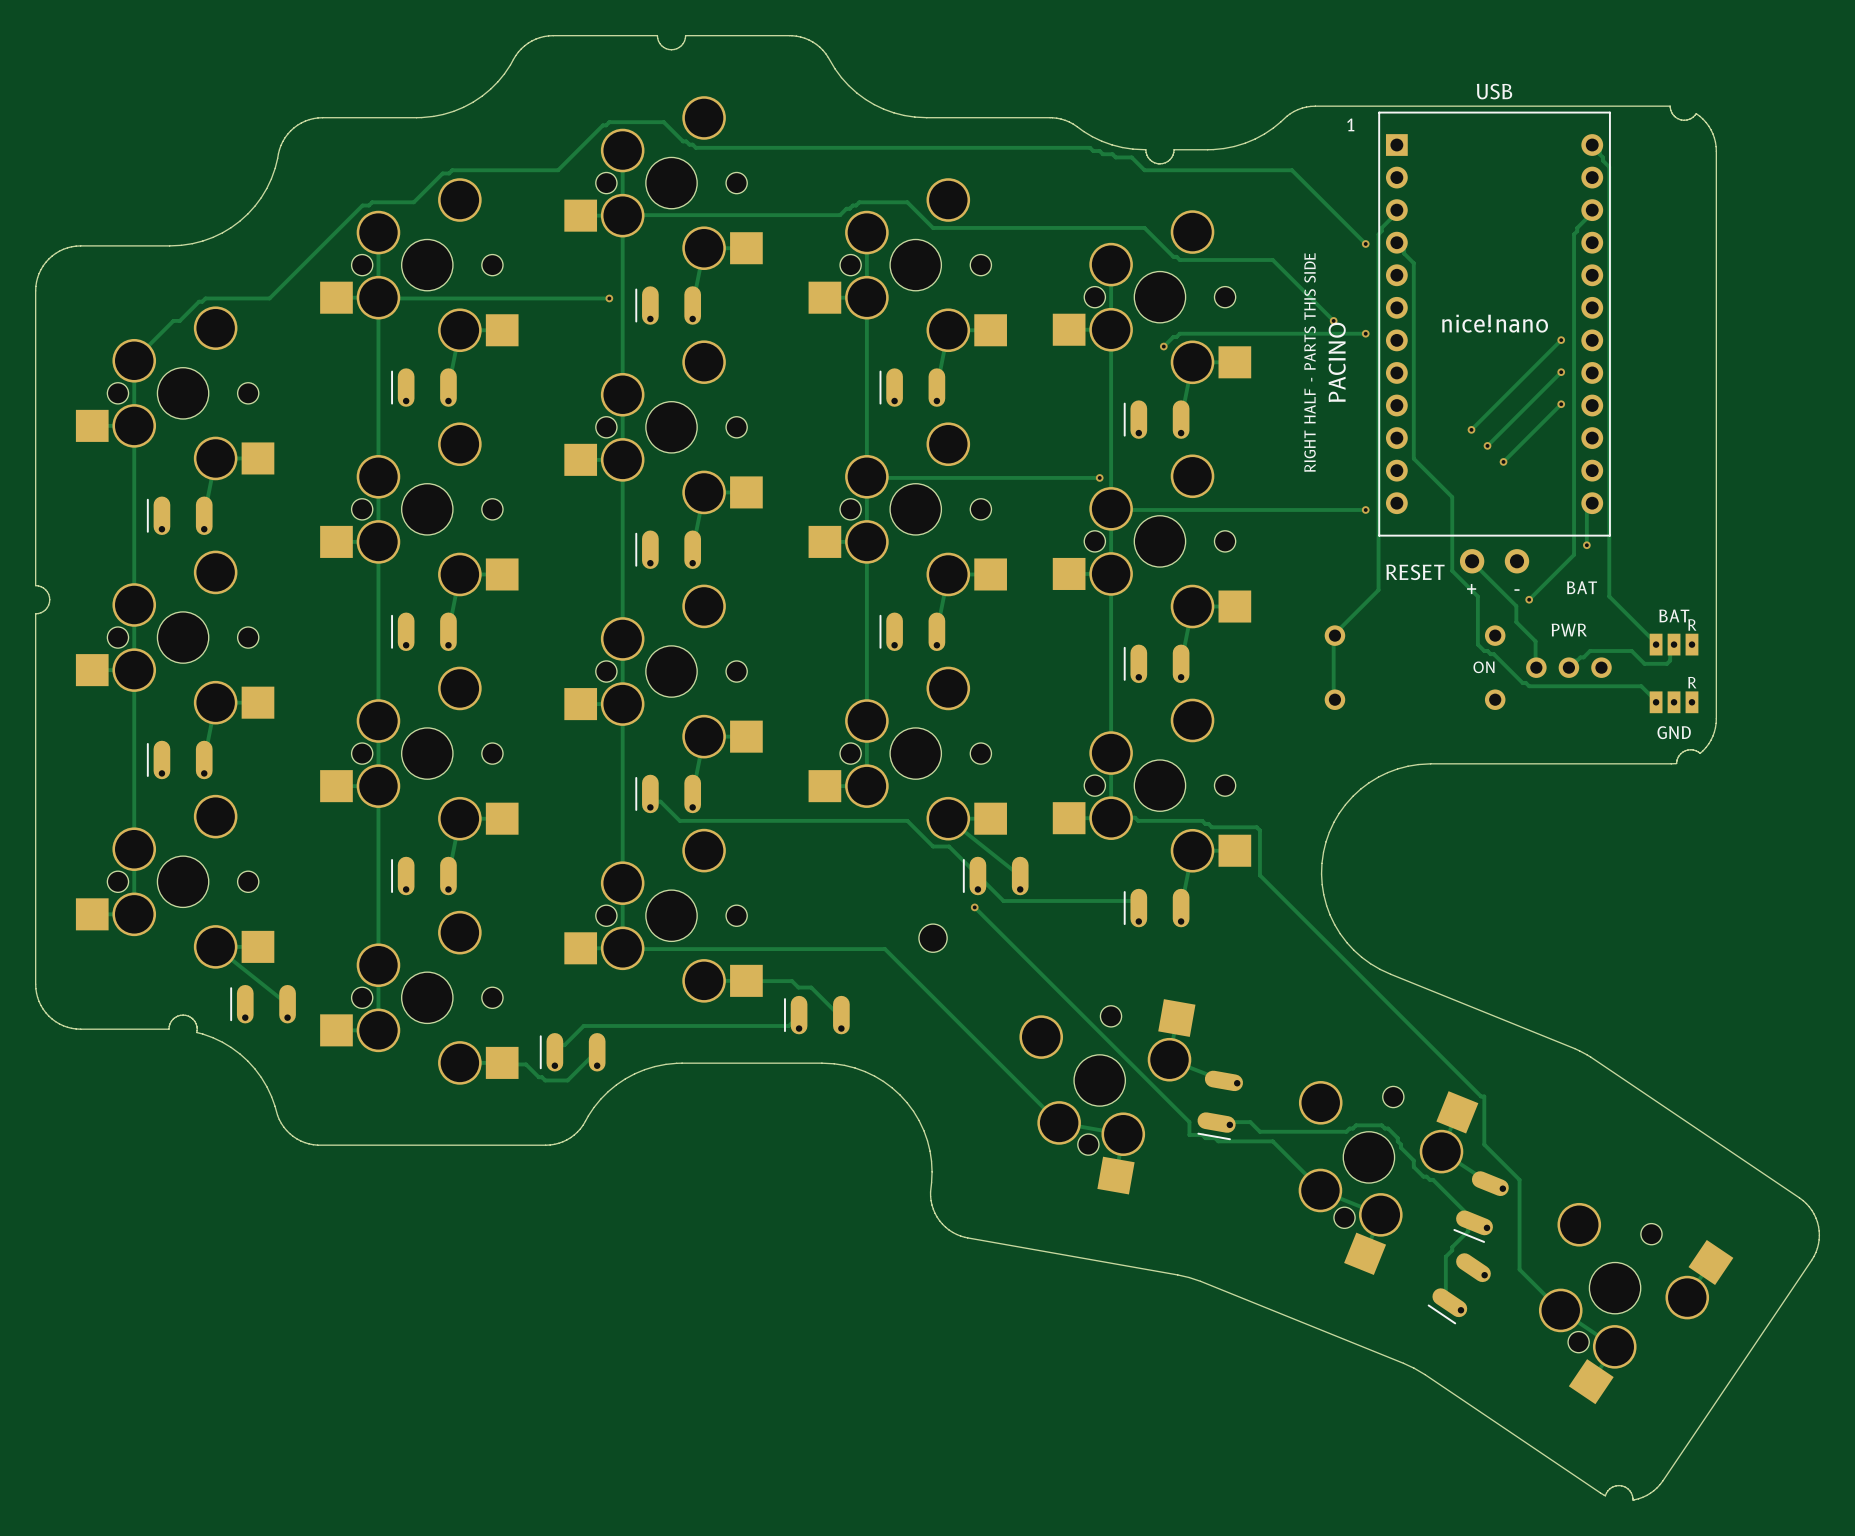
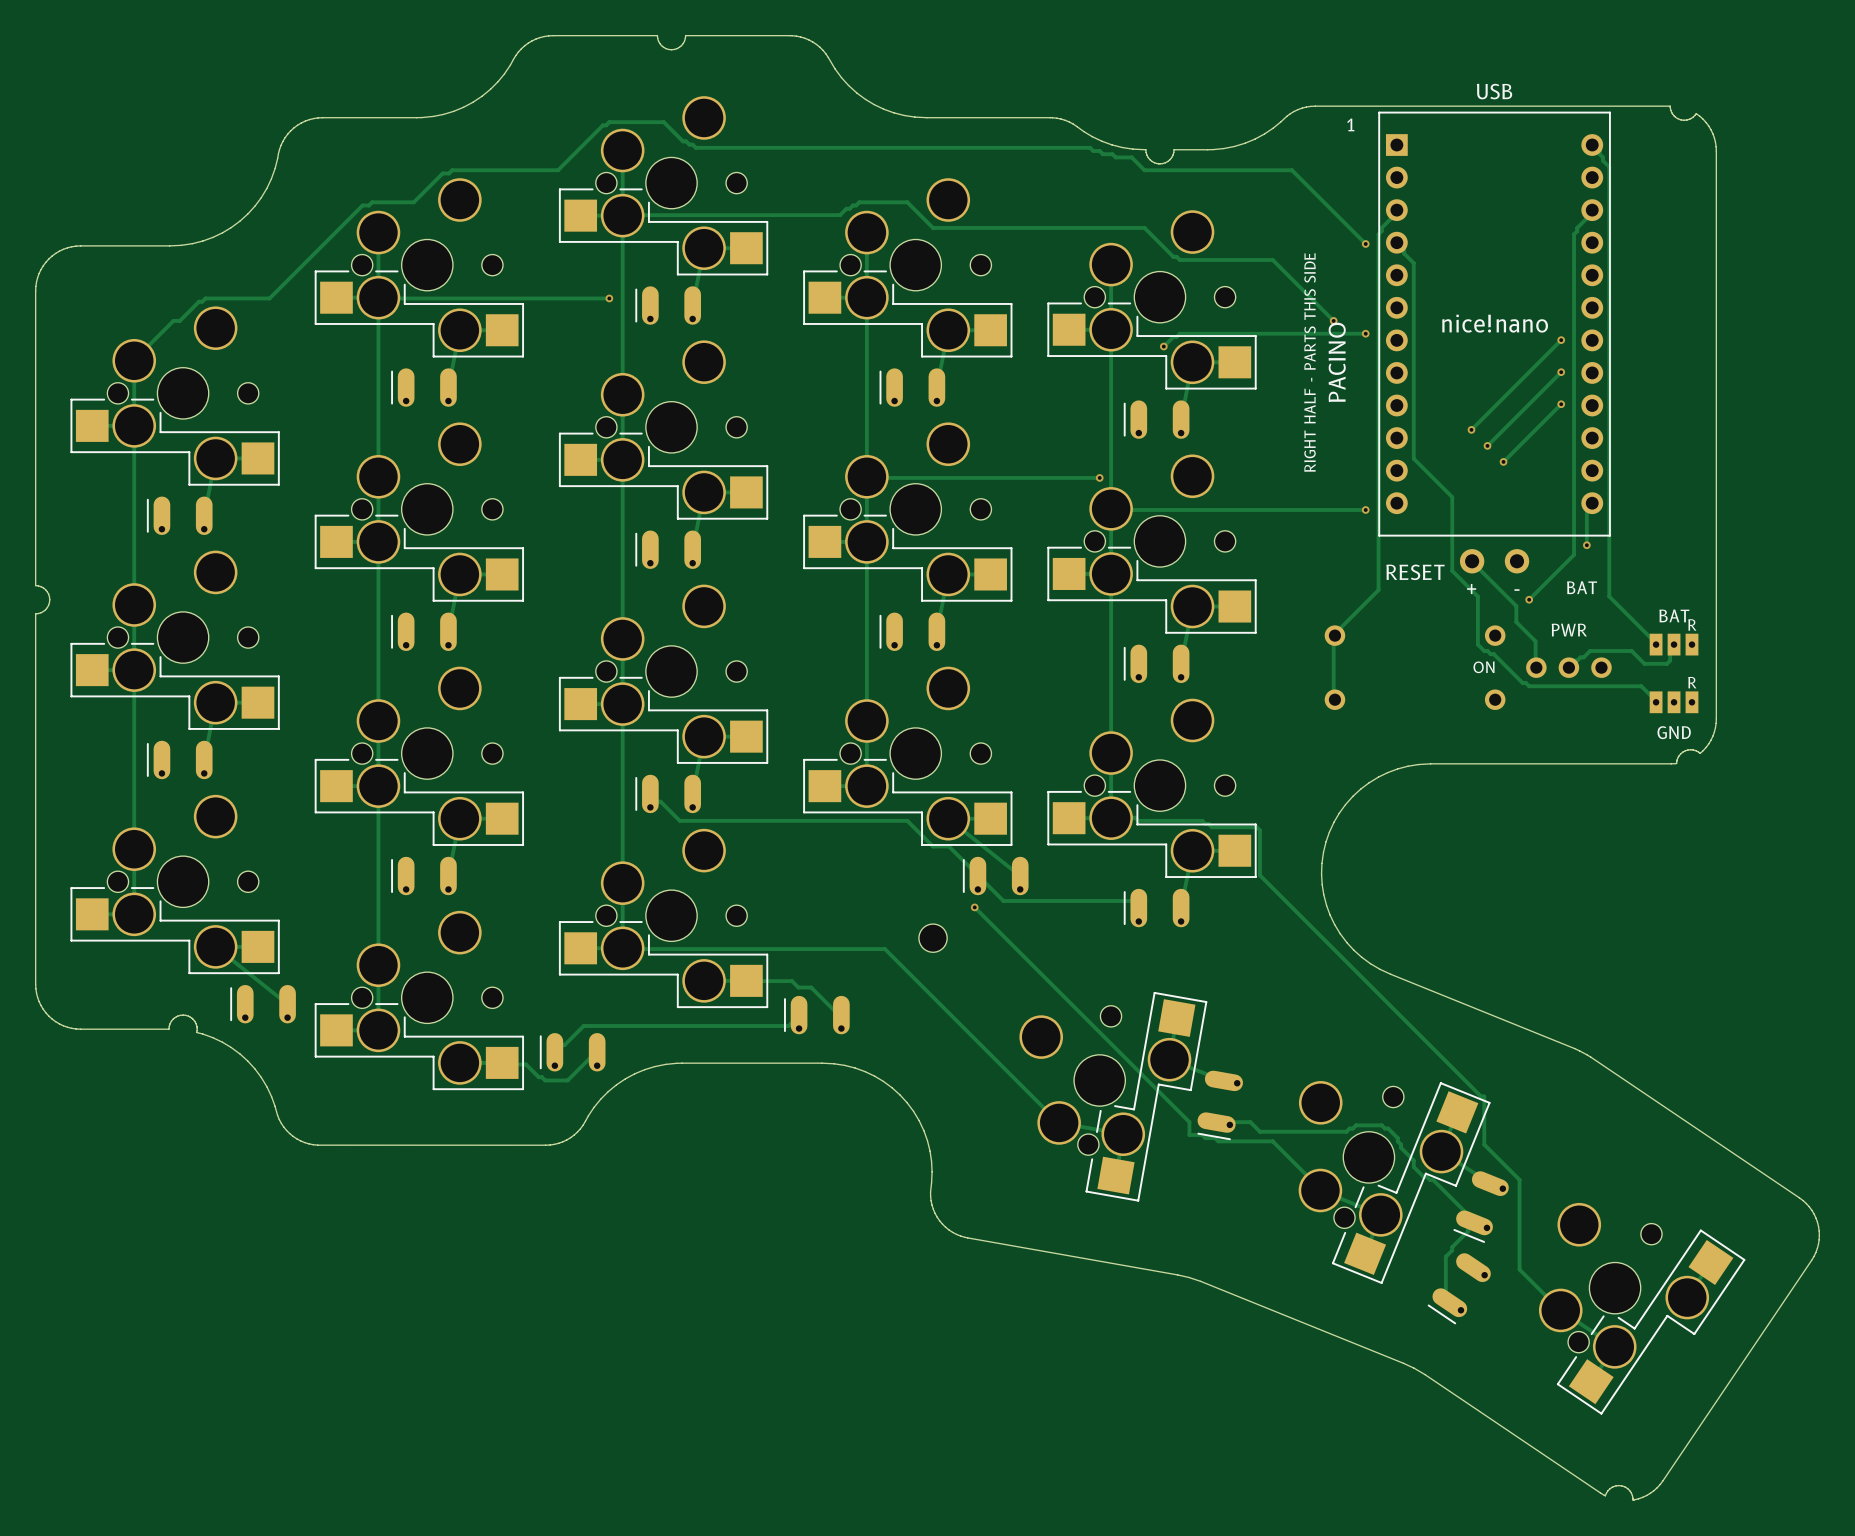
part footprint: [564, 96, 763, 271] -> [558, 96, 769, 276]
part footprint: [320, 178, 519, 353] -> [314, 178, 525, 358]
part footprint: [808, 178, 1007, 353] -> [803, 178, 1013, 358]
part footprint: [1052, 210, 1252, 385] -> [1047, 210, 1257, 390]
part footprint: [75, 306, 275, 481] -> [70, 306, 280, 486]
part footprint: [564, 340, 763, 515] -> [558, 340, 769, 520]
part footprint: [320, 422, 519, 597] -> [314, 422, 525, 602]
part footprint: [808, 422, 1007, 597] -> [803, 422, 1013, 602]
part footprint: [1052, 454, 1252, 629] -> [1047, 454, 1257, 634]
part footprint: [75, 550, 275, 725] -> [70, 550, 280, 730]
part footprint: [564, 584, 763, 759] -> [558, 584, 769, 764]
part footprint: [320, 666, 519, 841] -> [314, 666, 525, 846]
part footprint: [808, 666, 1007, 841] -> [803, 666, 1013, 846]
part footprint: [1052, 698, 1252, 873] -> [1047, 698, 1257, 878]
part footprint: [75, 794, 275, 969] -> [70, 794, 280, 975]
part footprint: [564, 828, 763, 1003] -> [558, 828, 769, 1009]
part footprint: [320, 910, 519, 1085] -> [314, 910, 525, 1091]
part footprint: [1019, 999, 1196, 1195] -> [1019, 991, 1208, 1202]
part footprint: [1298, 1081, 1479, 1275] -> [1298, 1081, 1491, 1284]
part footprint: [1538, 1202, 1734, 1405] -> [1538, 1202, 1746, 1415]

